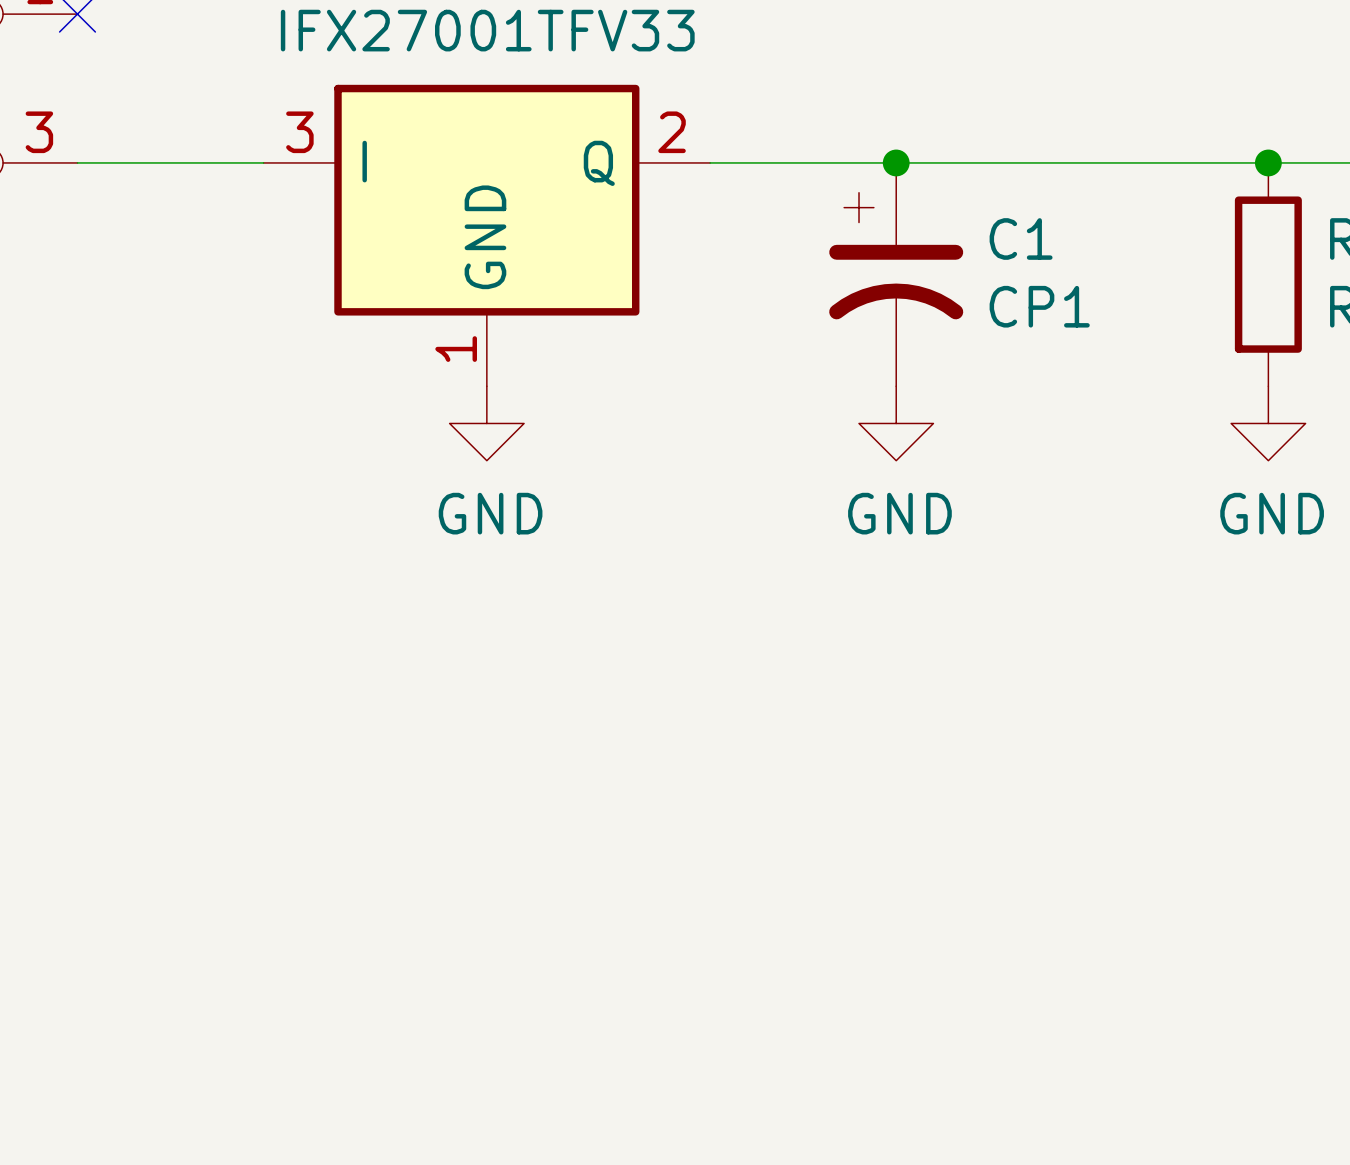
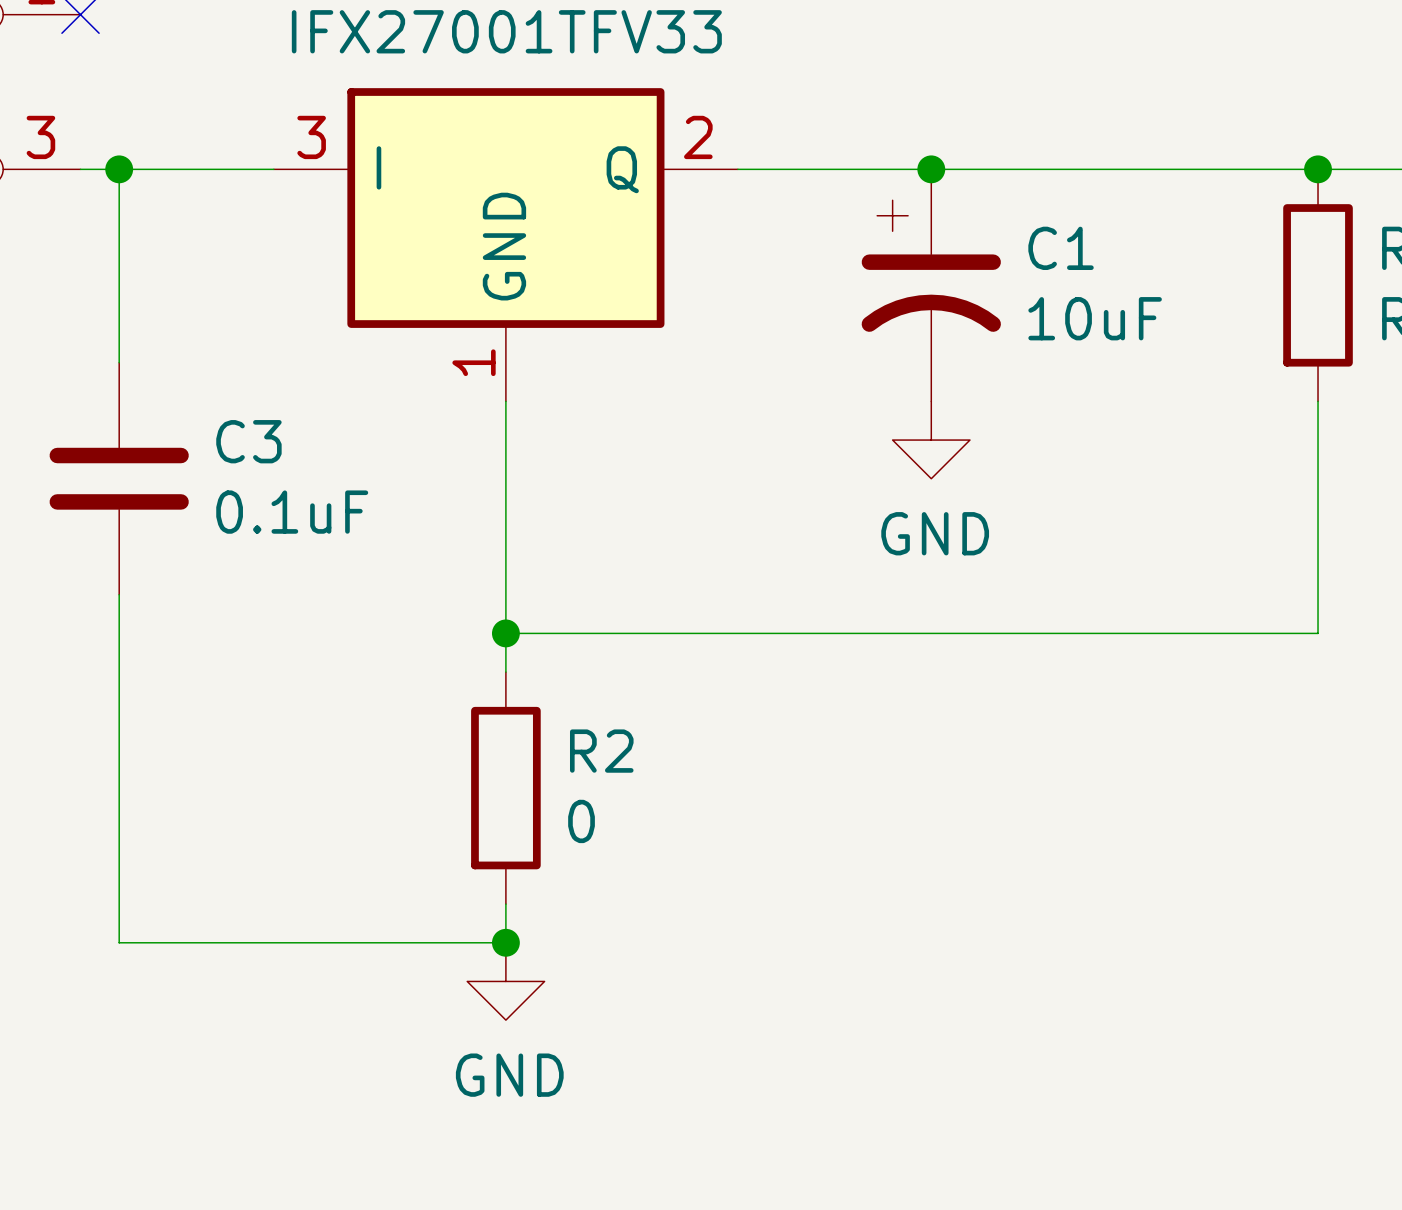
wire: none -> (119, 169) (119, 362)
junction: none -> (119, 169)
C1 value: CP1 (1039, 306) -> 10uF (1095, 318)
wire: none -> (505, 401) (505, 672)
wire: none -> (1318, 401) (1318, 633) (505, 633)
power symbol: GND (486, 423) -> none
power symbol: GND (1268, 423) -> none
C3: none -> 0.1uF (119, 478)
wire: none -> (119, 594) (119, 942) (505, 942) (505, 904)
junction: none -> (505, 633)
R2: none -> 0 (505, 788)
junction: none -> (505, 942)
power symbol: none -> GND (505, 981)

